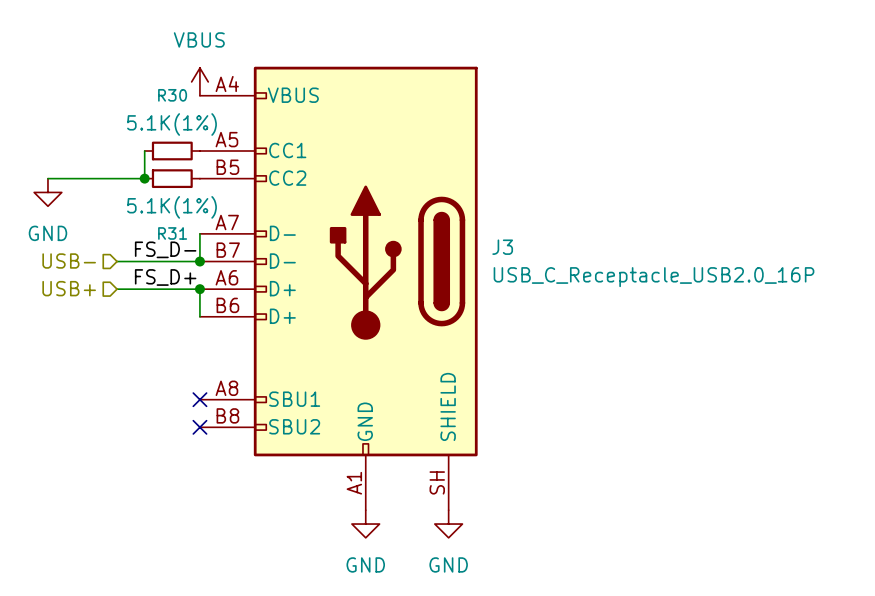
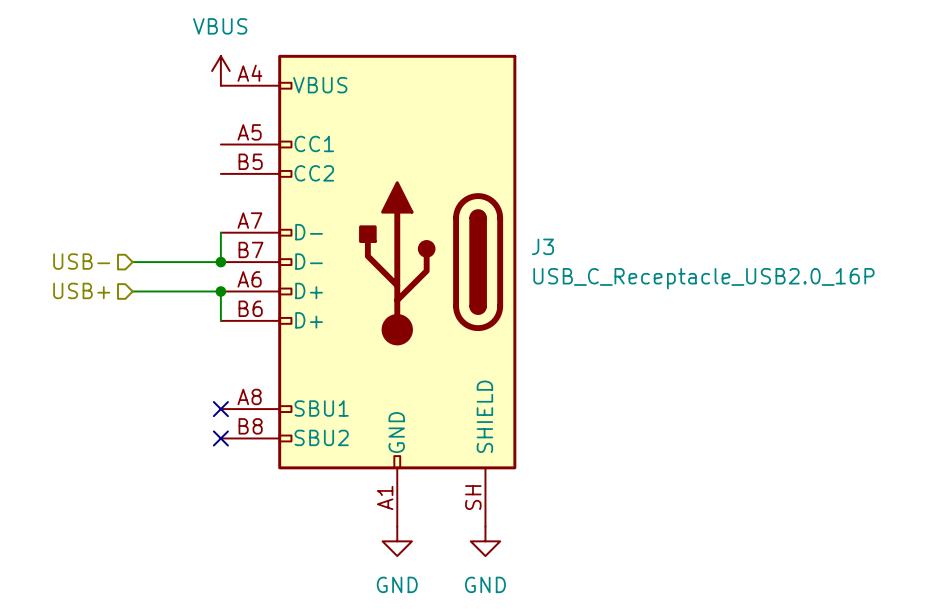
wire: (144, 151) (144, 178) (47, 178) -> none
R30: 5.1K(1%) (172, 151) -> none
junction: (144, 178) -> none
R31: 5.1K(1%) (172, 178) -> none
power symbol: GND (47, 192) -> none
label: FS_D- (165, 249) -> none
label: FS_D+ (165, 277) -> none

